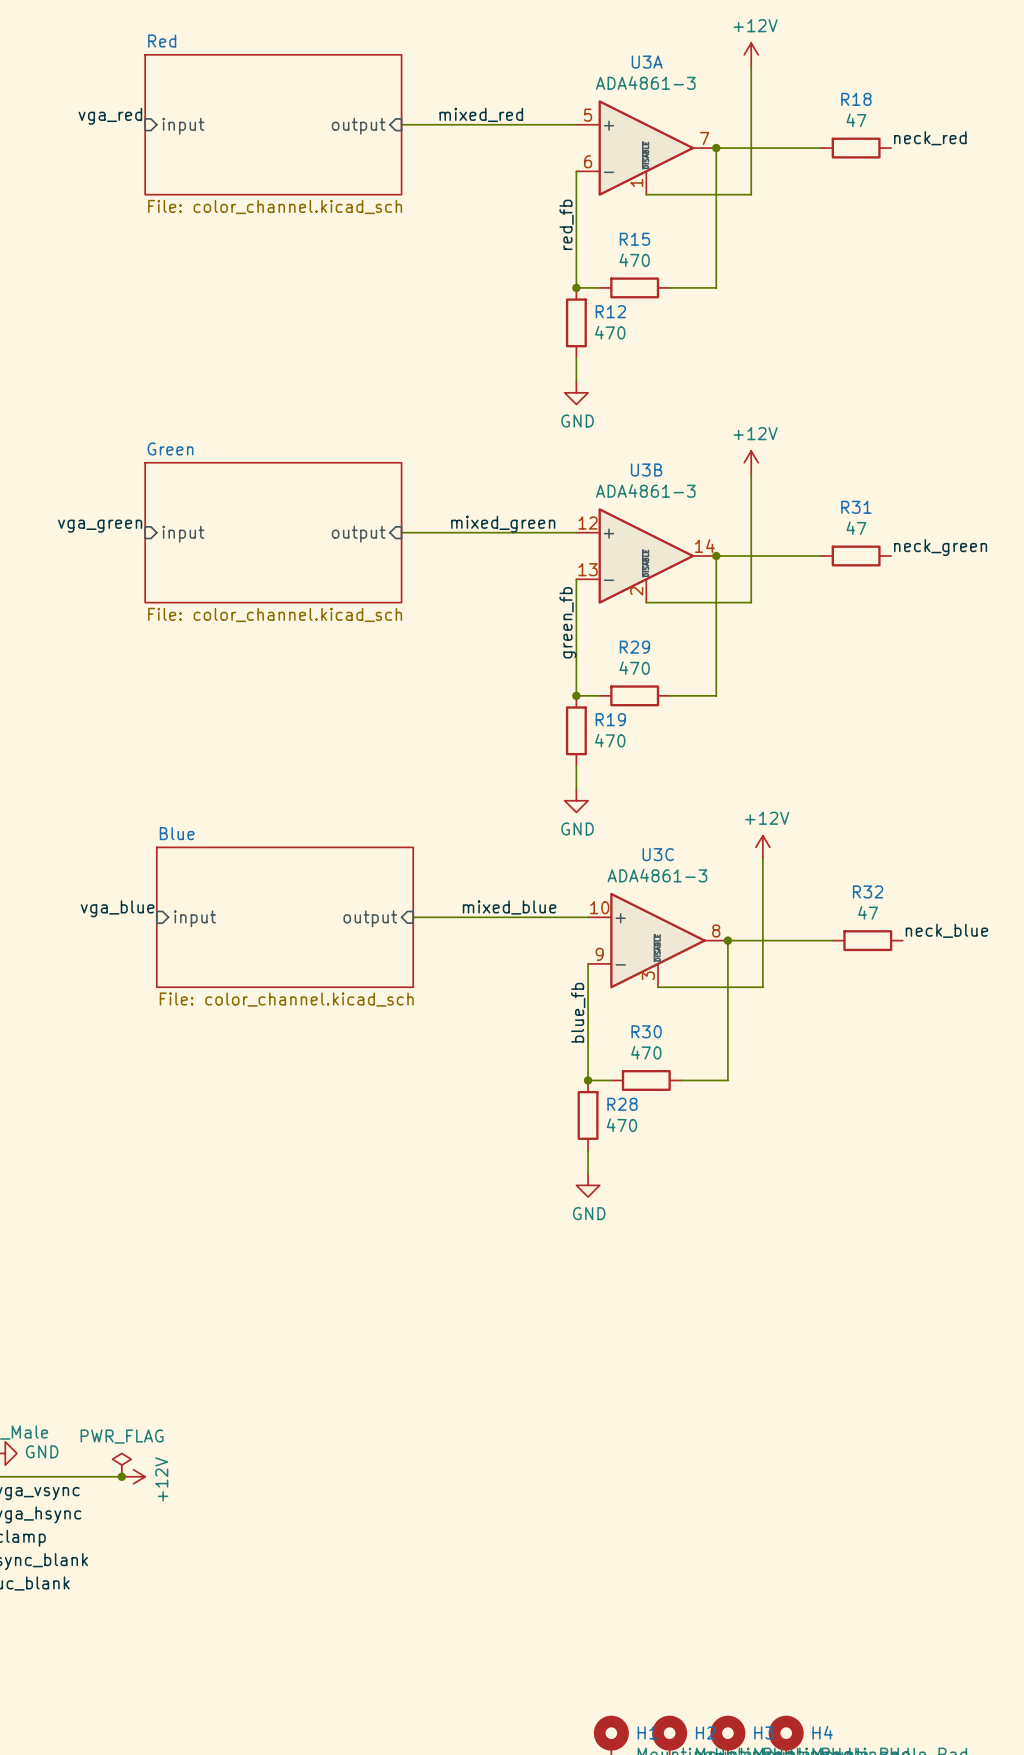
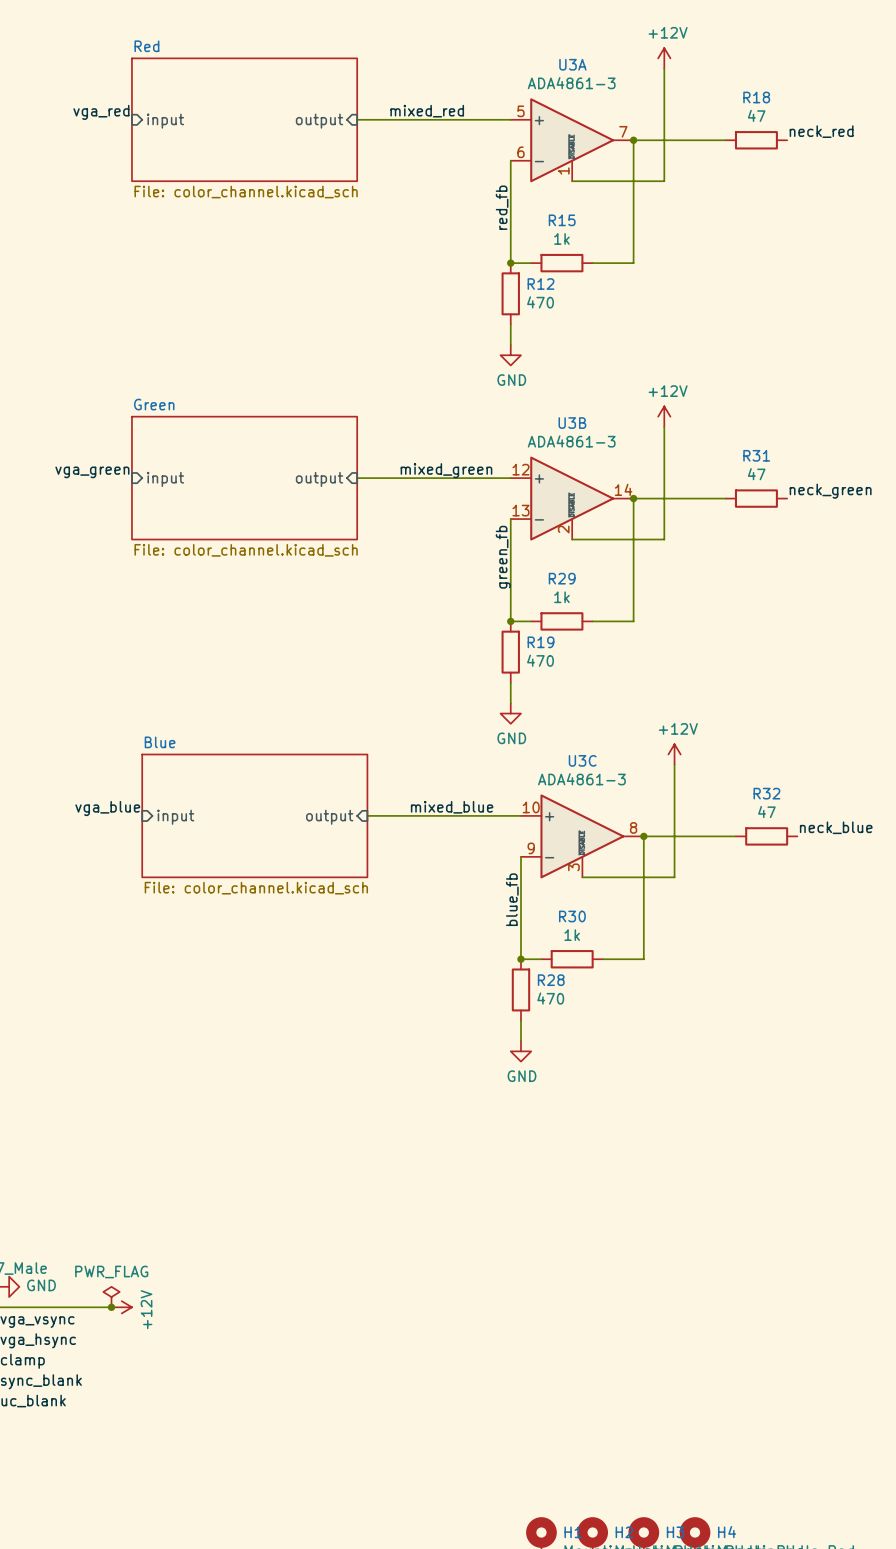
R15 value: 470 (634, 260) -> 1k (561, 238)
R29 value: 470 (634, 668) -> 1k (561, 597)
R30 value: 470 (646, 1052) -> 1k (572, 935)

